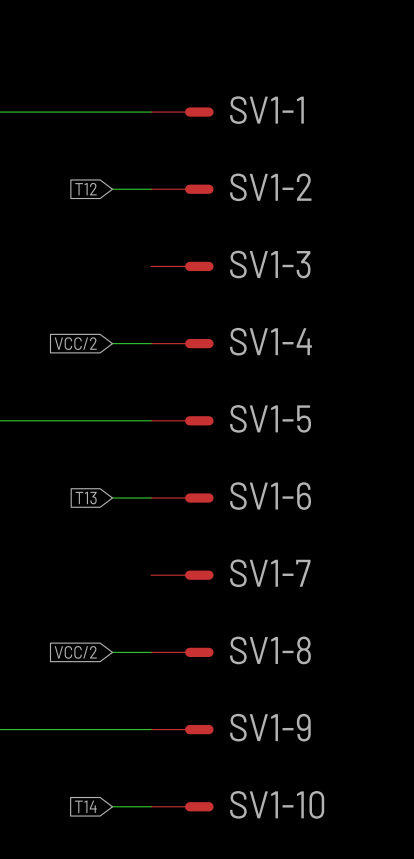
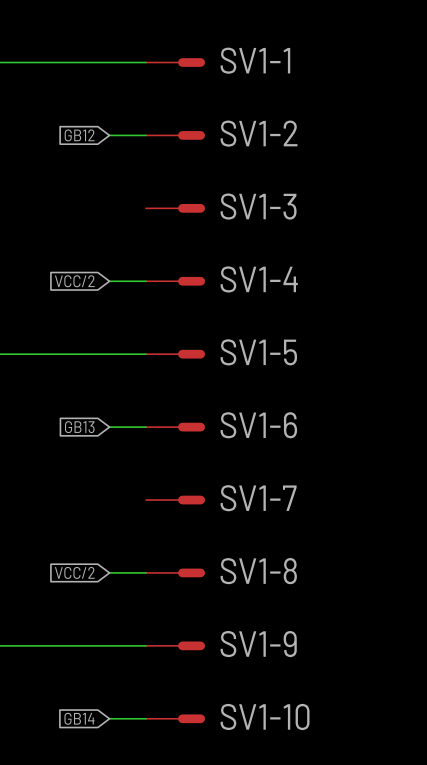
global label: T12 (86, 189) -> GB12 (79, 135)
global label: T13 (86, 498) -> GB13 (79, 427)
global label: T14 (85, 806) -> GB14 (79, 718)

